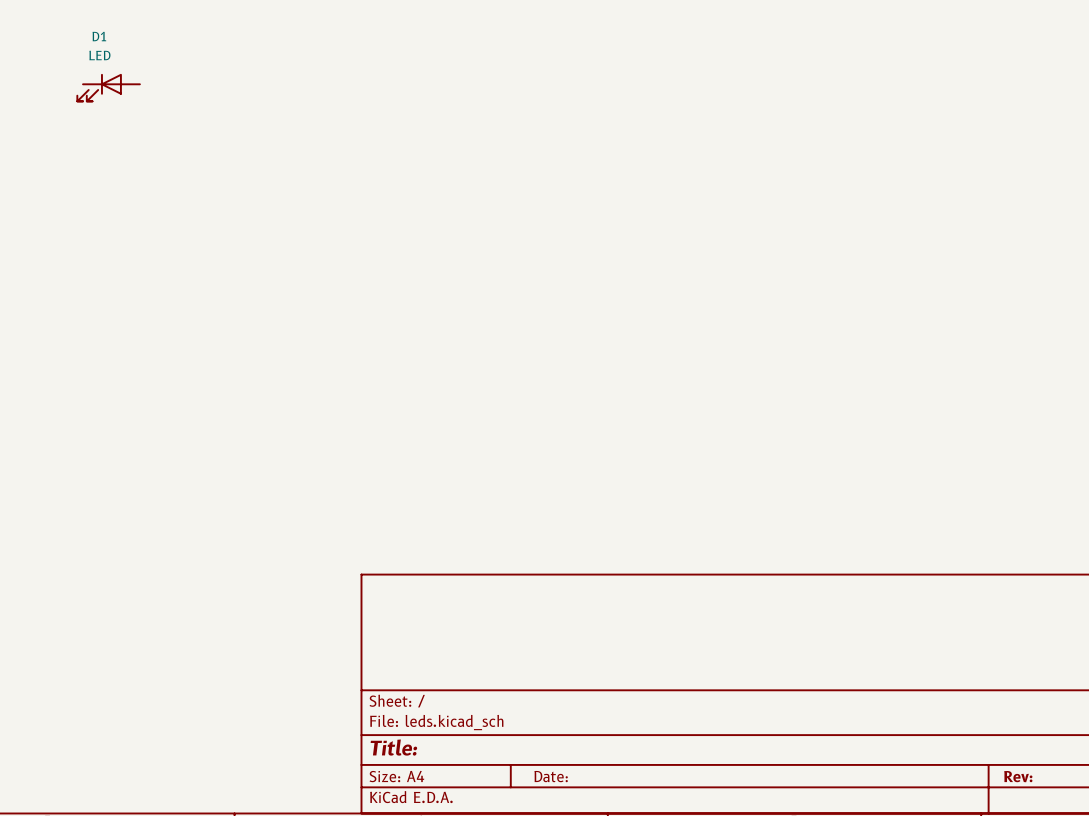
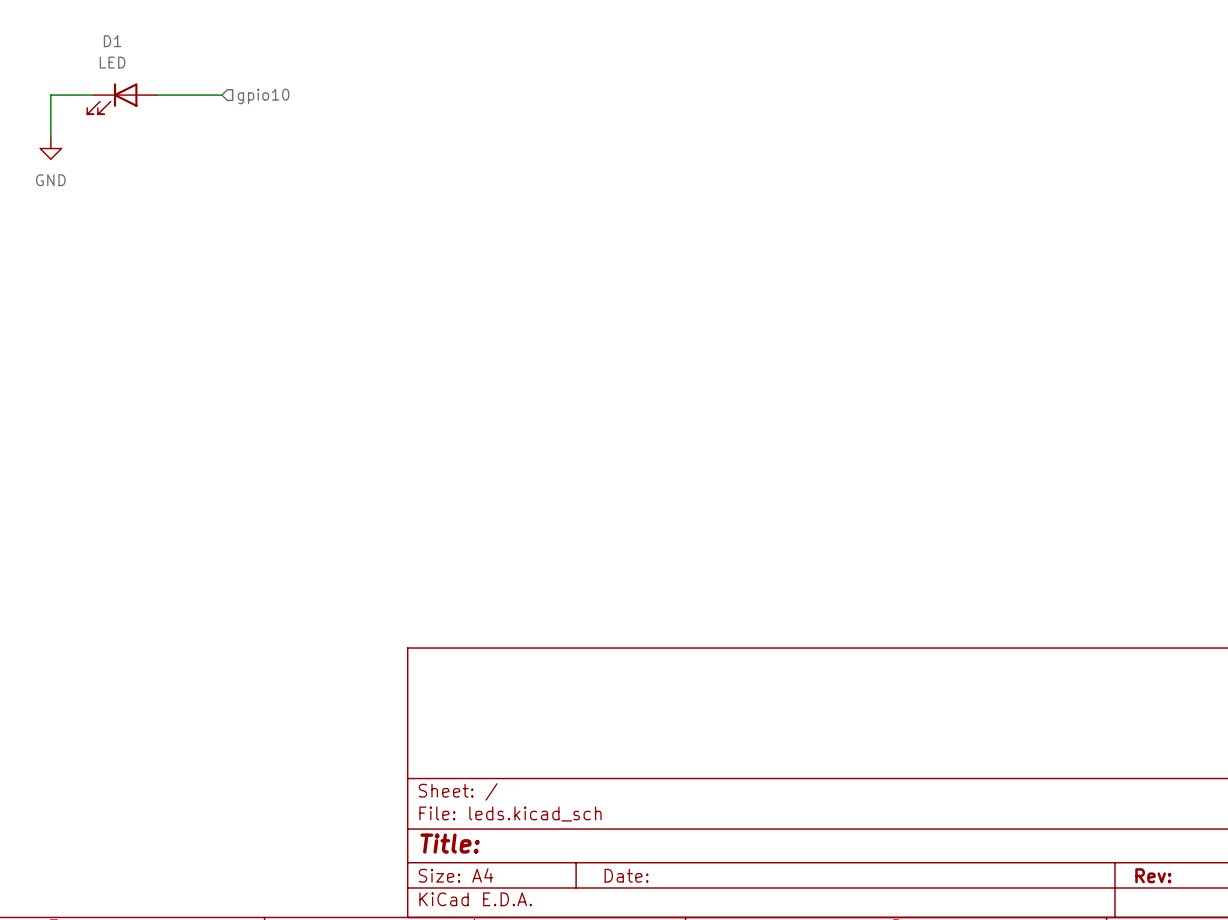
wire: none -> (93, 95) (50, 95) (50, 137)
wire: none -> (157, 95) (221, 95)
hierarchical label: none -> gpio10 (263, 96)
power symbol: none -> GND (50, 148)

